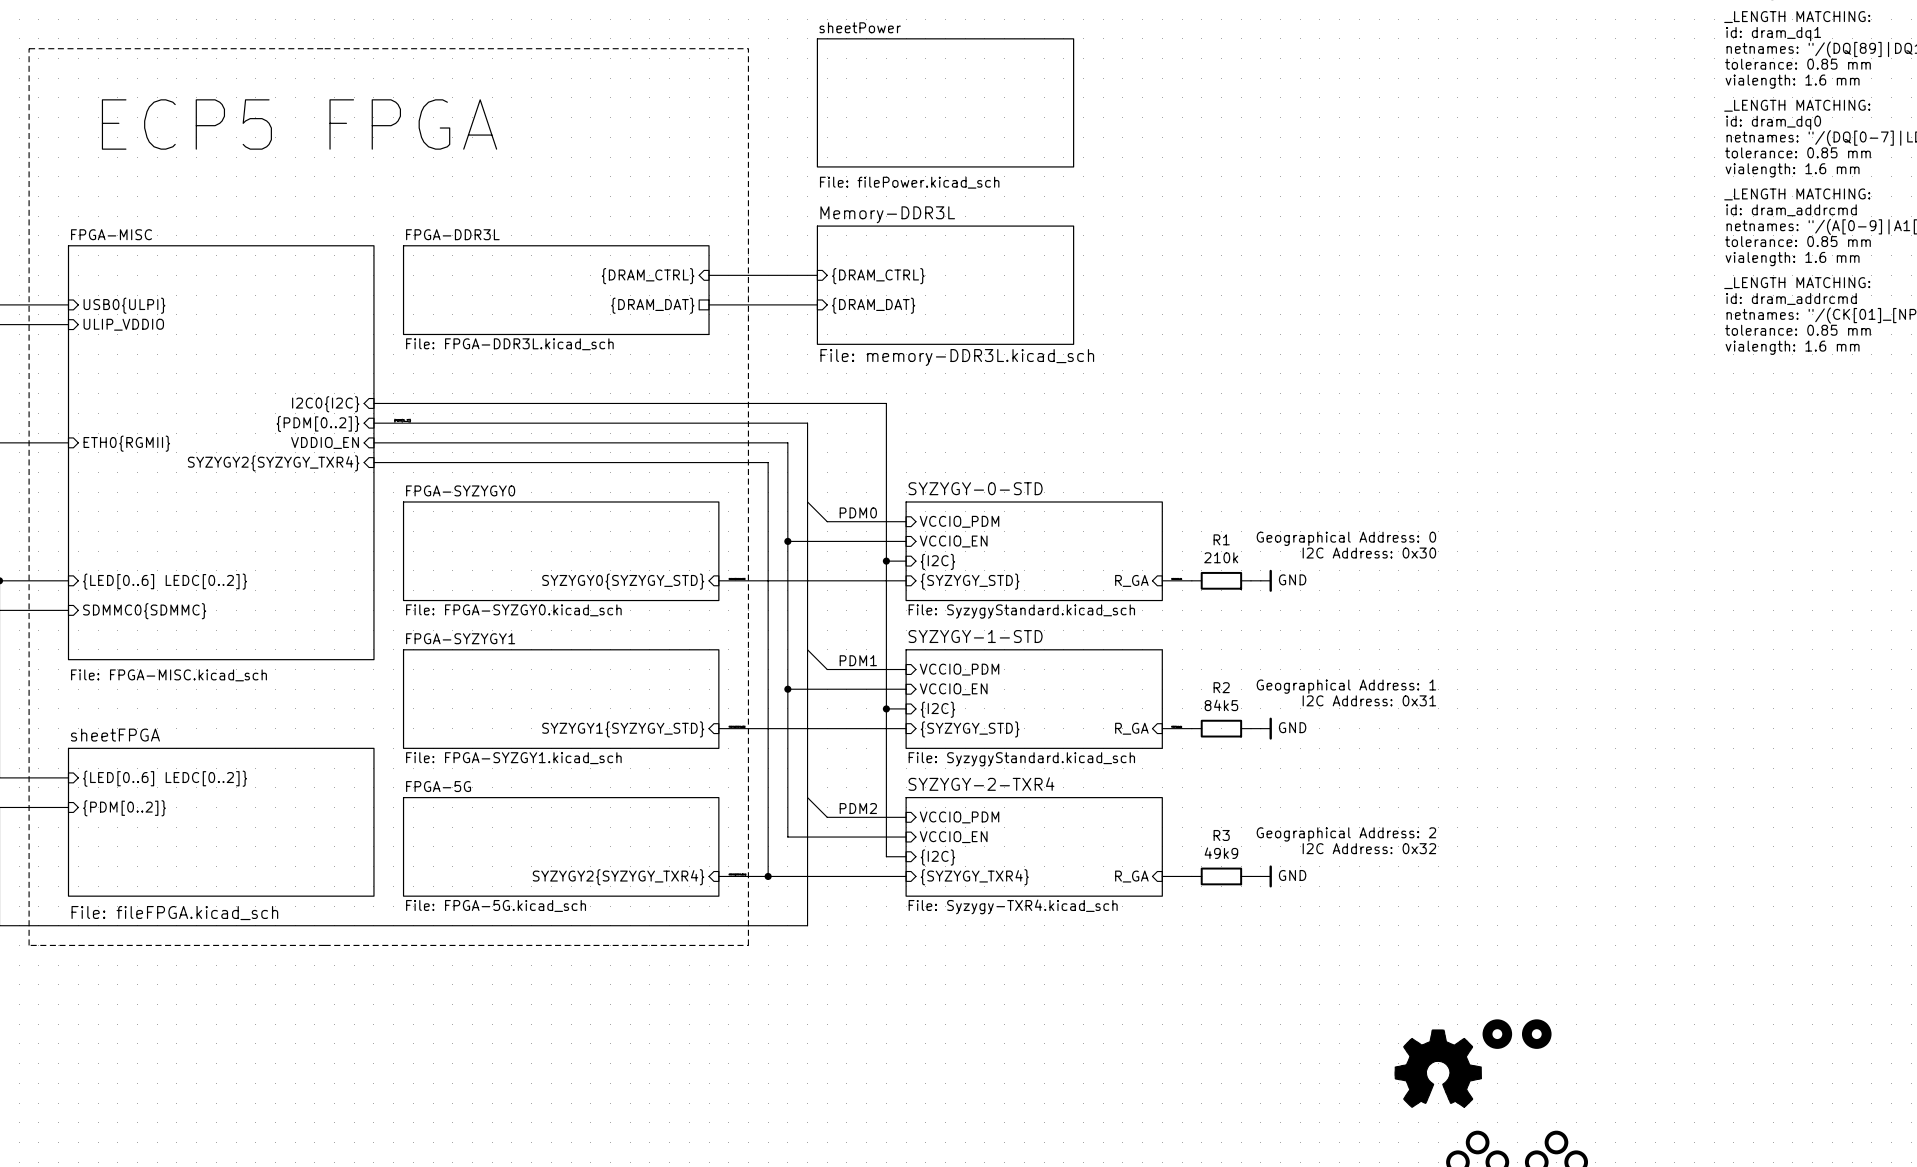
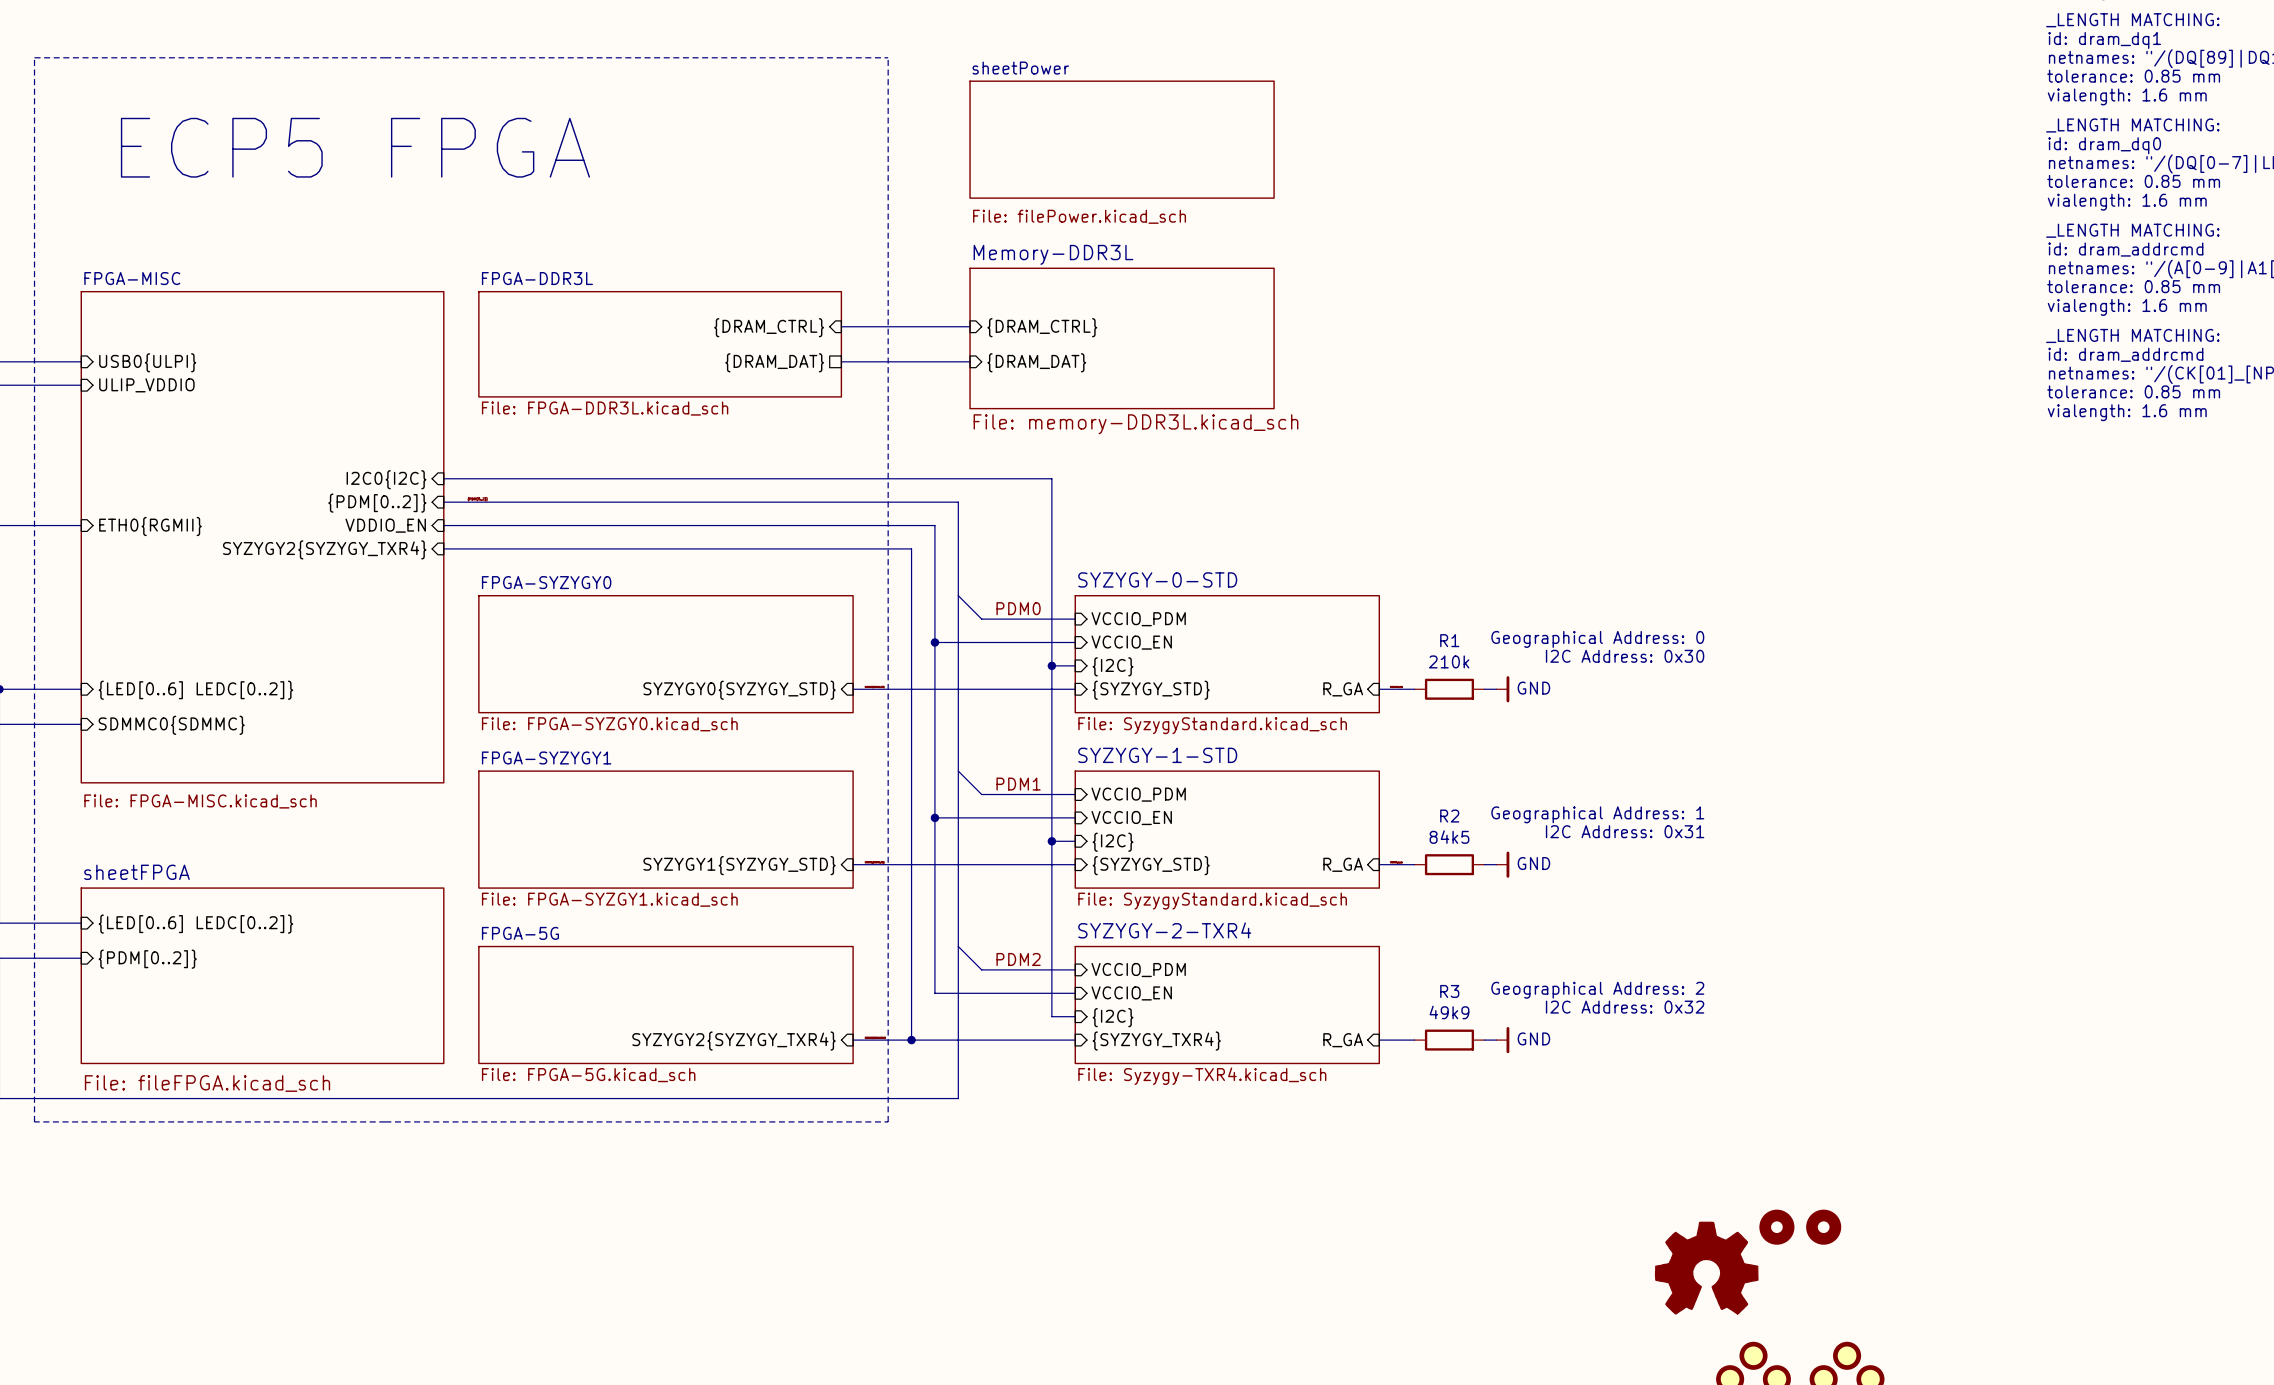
sheet sheetPower: File: filePower.kicad_sch (945, 102) -> none
sheet sheetPower: none -> File: filePower.kicad_sch (1122, 139)

